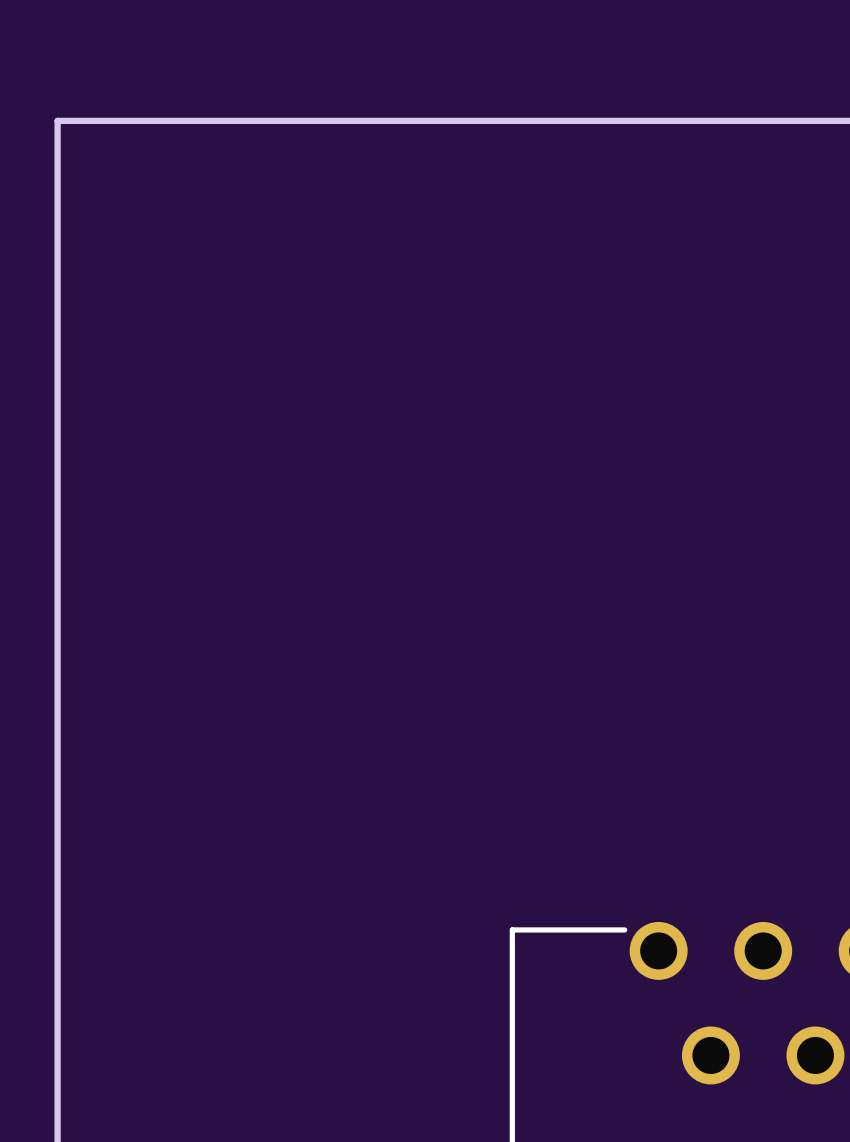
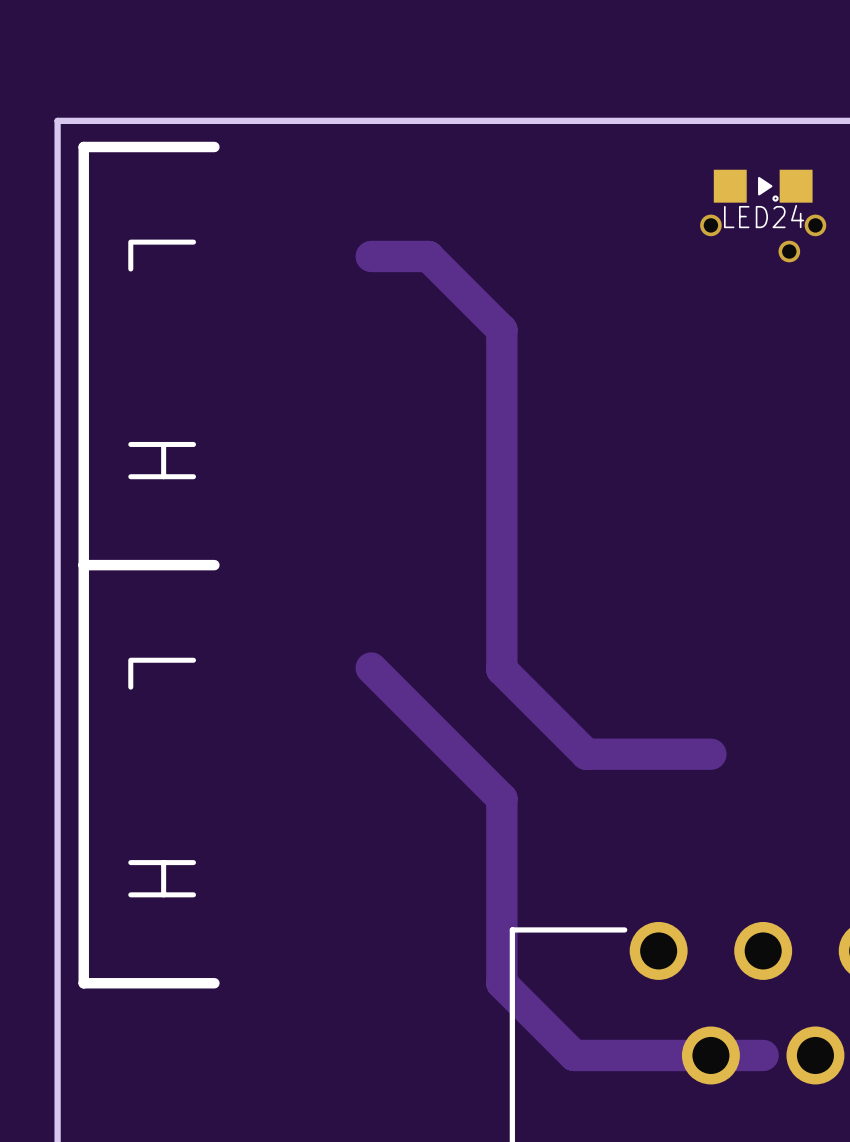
line: none -> (214, 147) (83, 147) (83, 983) (214, 983)
LED24: none -> (763, 186)
via: none -> (710, 225)
via: none -> (815, 225)
via: none -> (789, 251)
text: none -> L (162, 255)
track: none -> (371, 256) (428, 256) (501, 329) (501, 669) (586, 754) (710, 754)
text: none -> H (162, 460)
line: none -> (83, 565) (214, 565)
track: none -> (371, 668) (501, 798) (501, 983) (574, 1055) (763, 1055)
text: none -> L (162, 673)
text: none -> H (162, 878)

